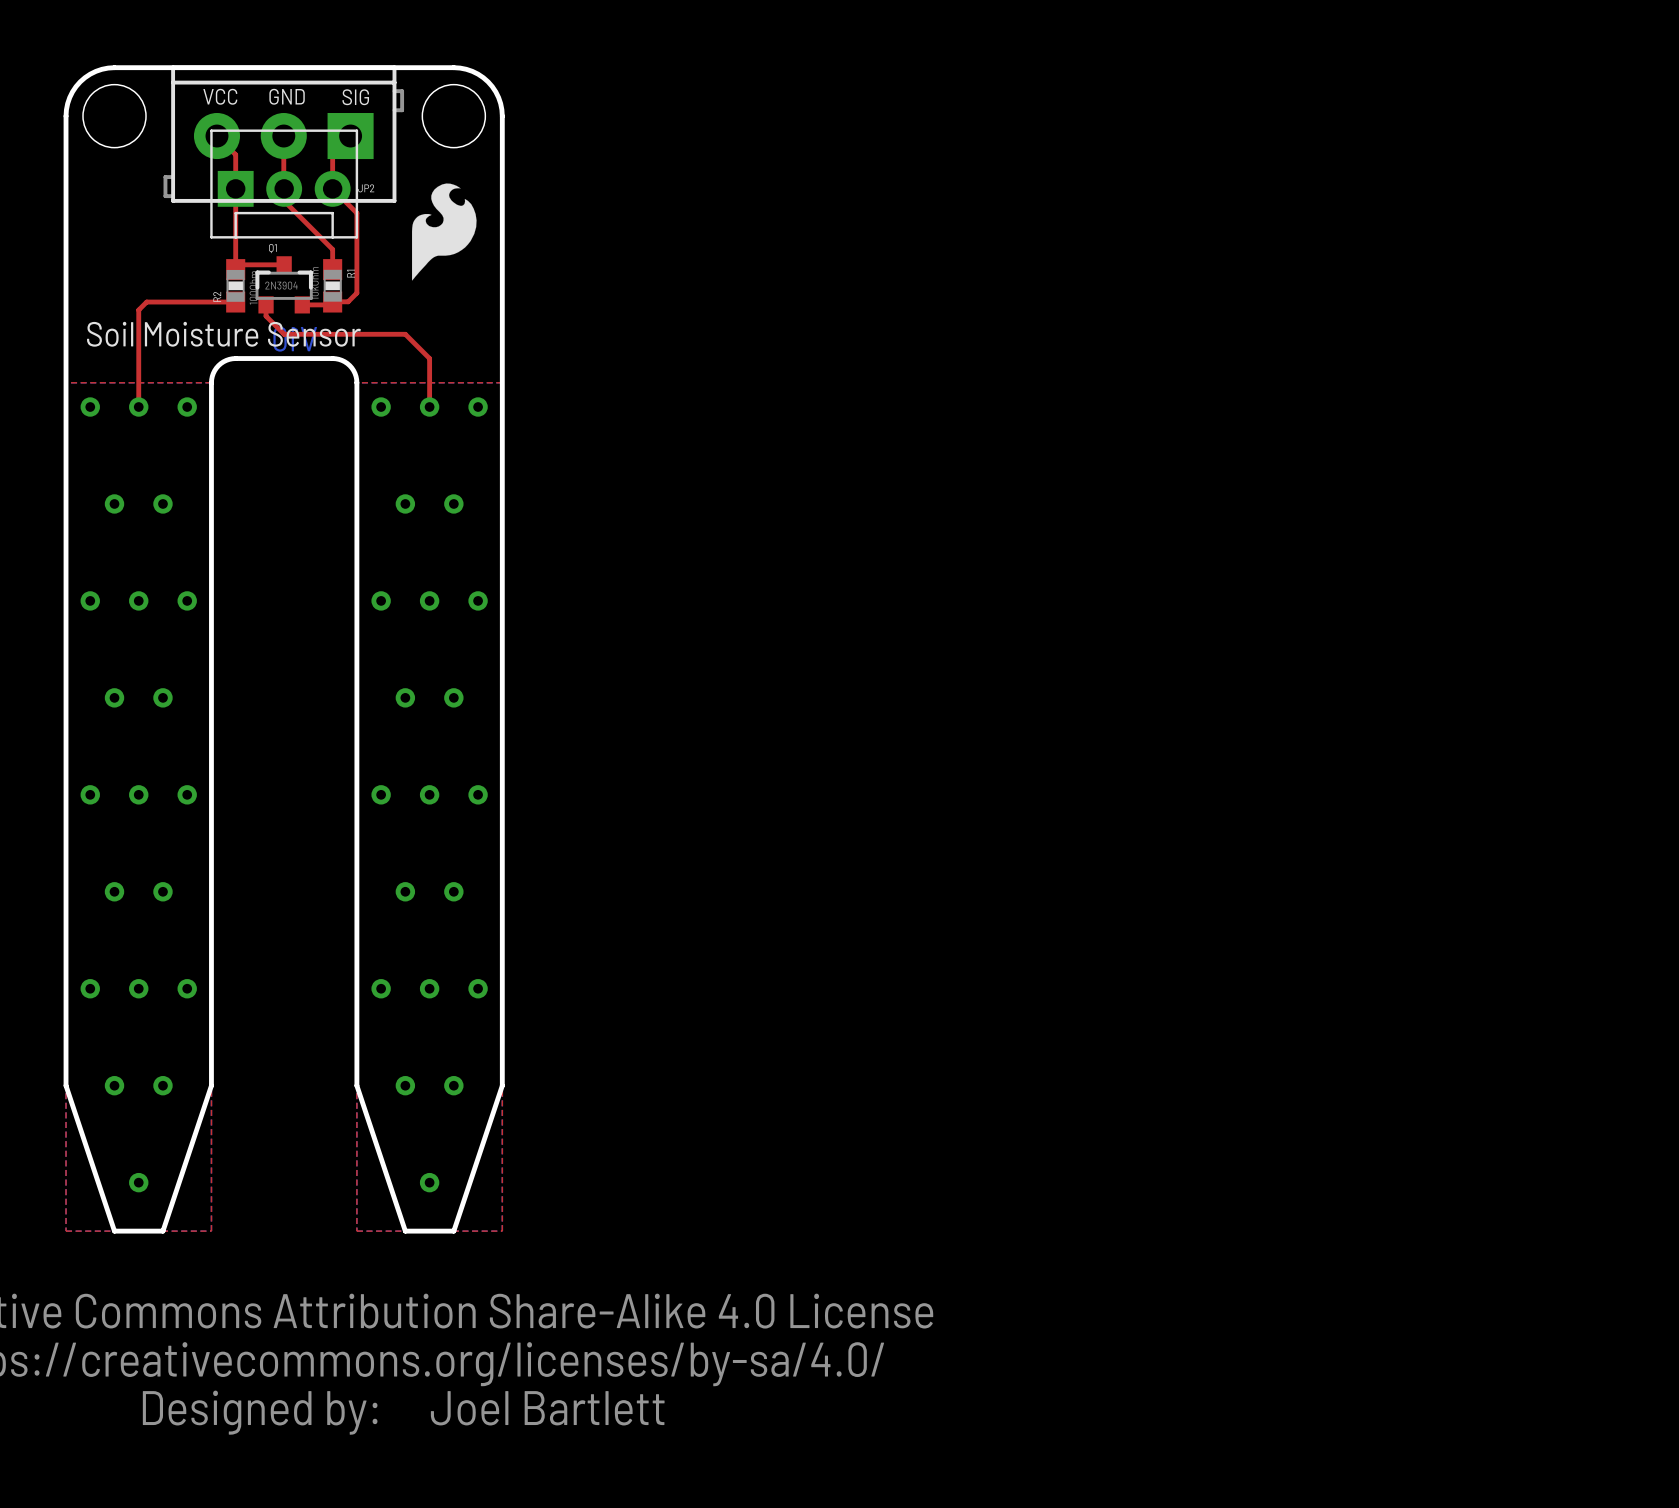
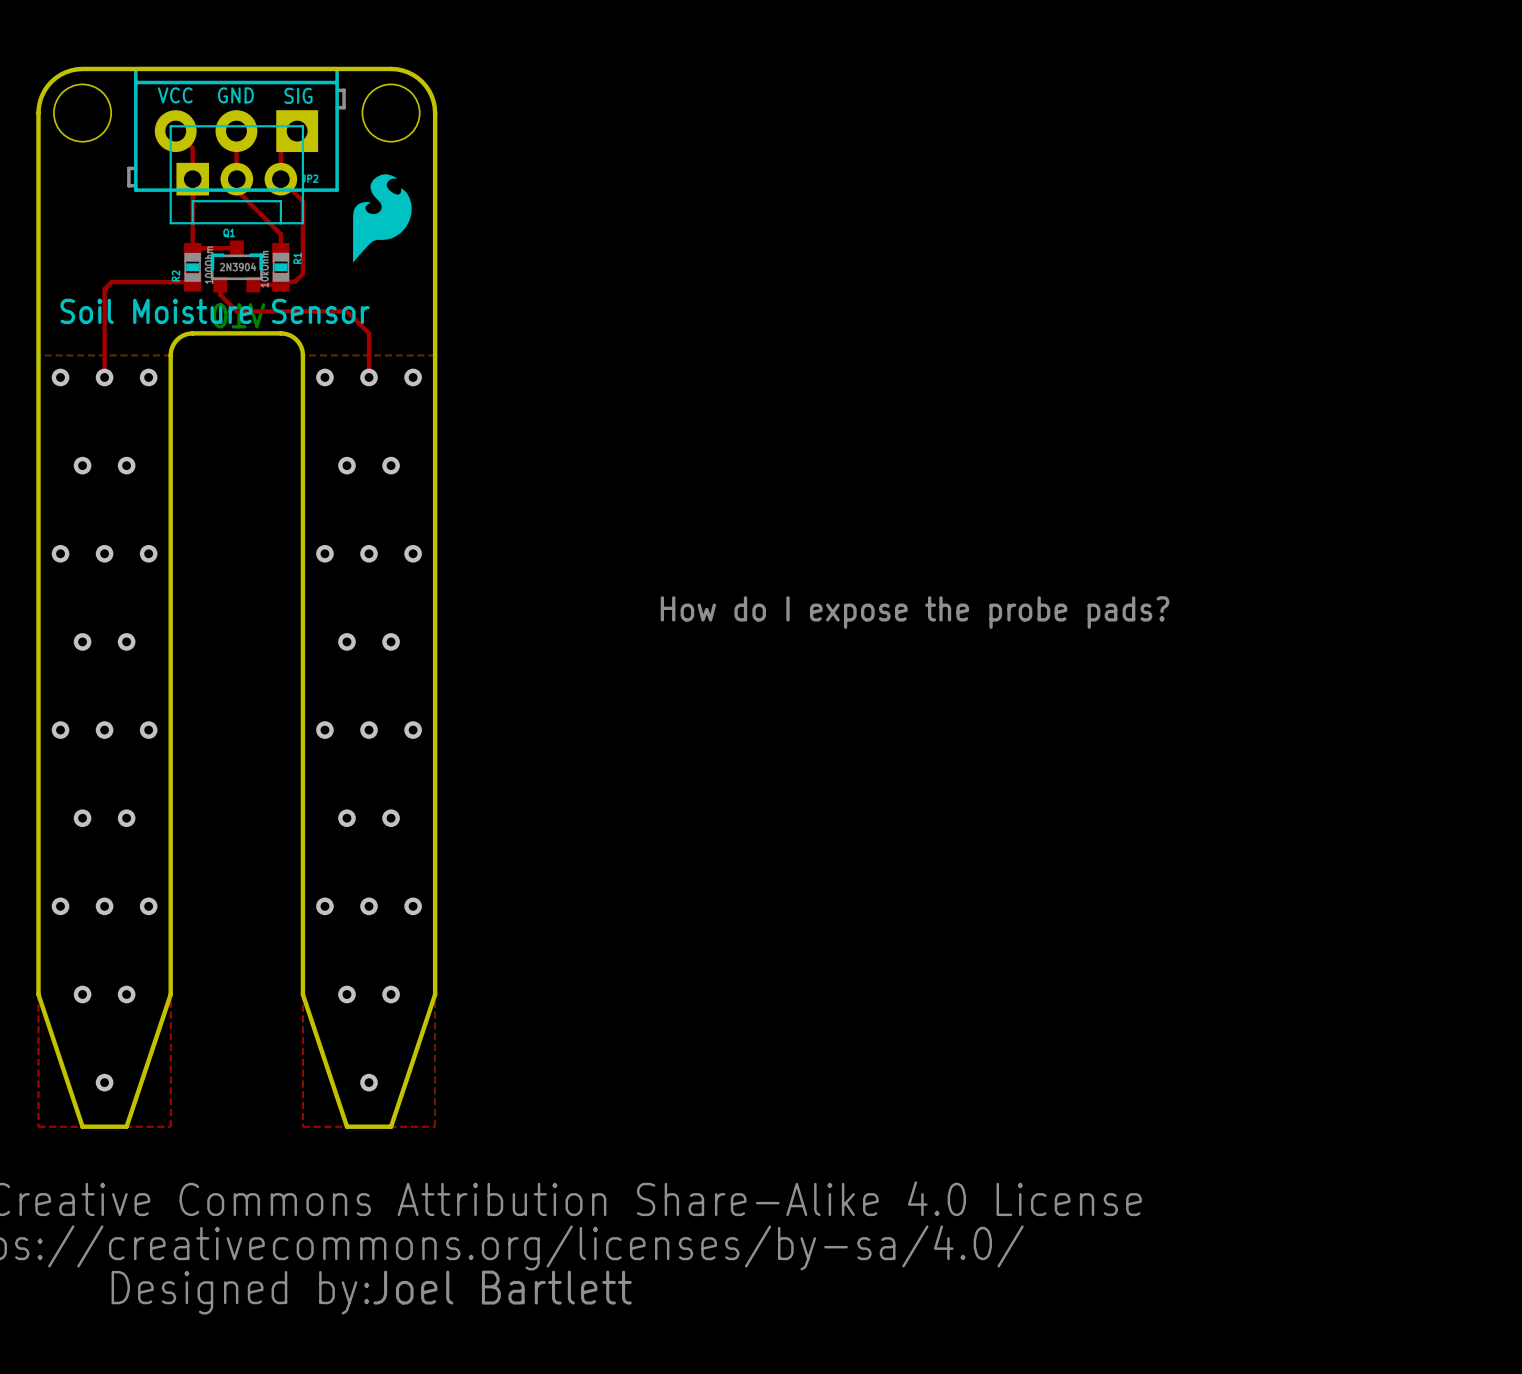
text: none -> How do I expose the probe pads? (915, 612)

